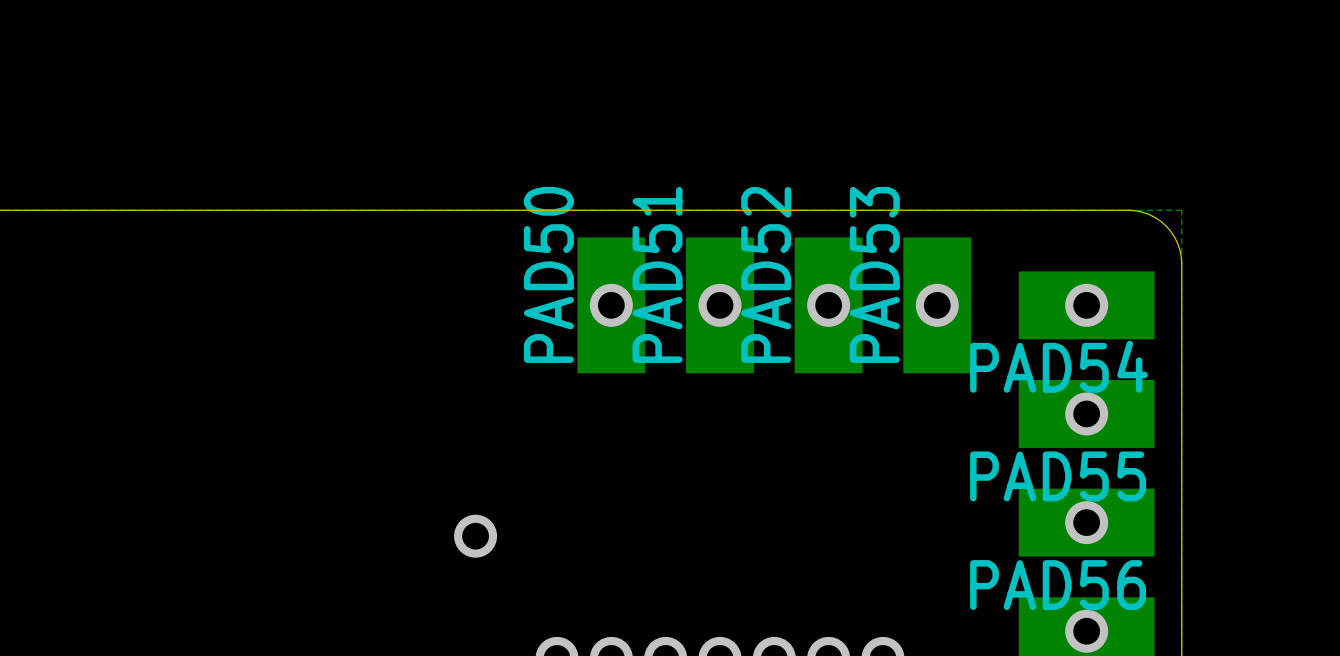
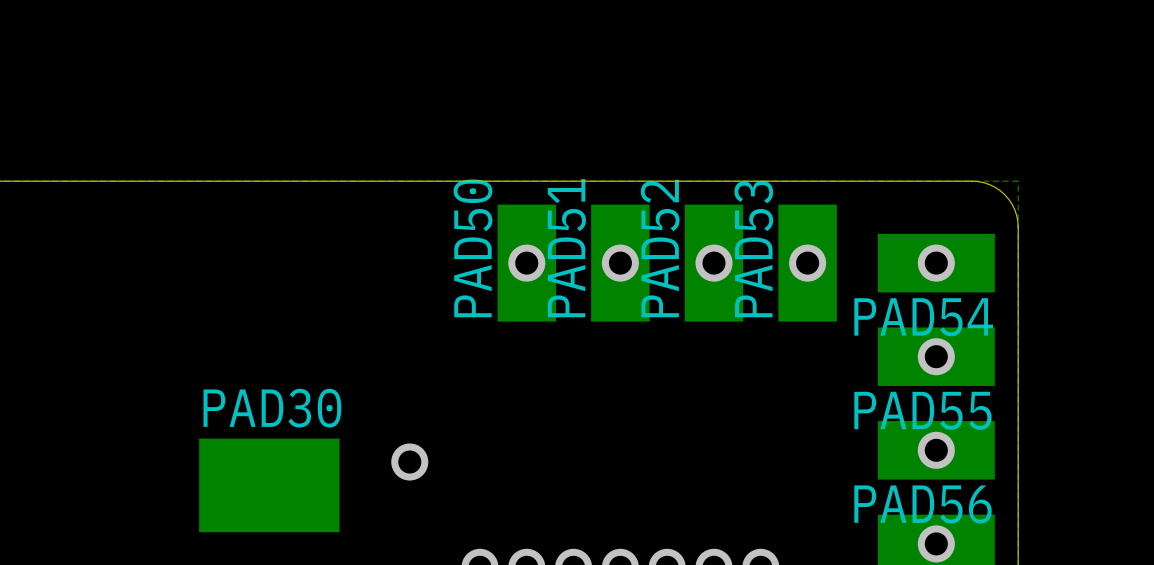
PAD30: none -> (269, 485)

